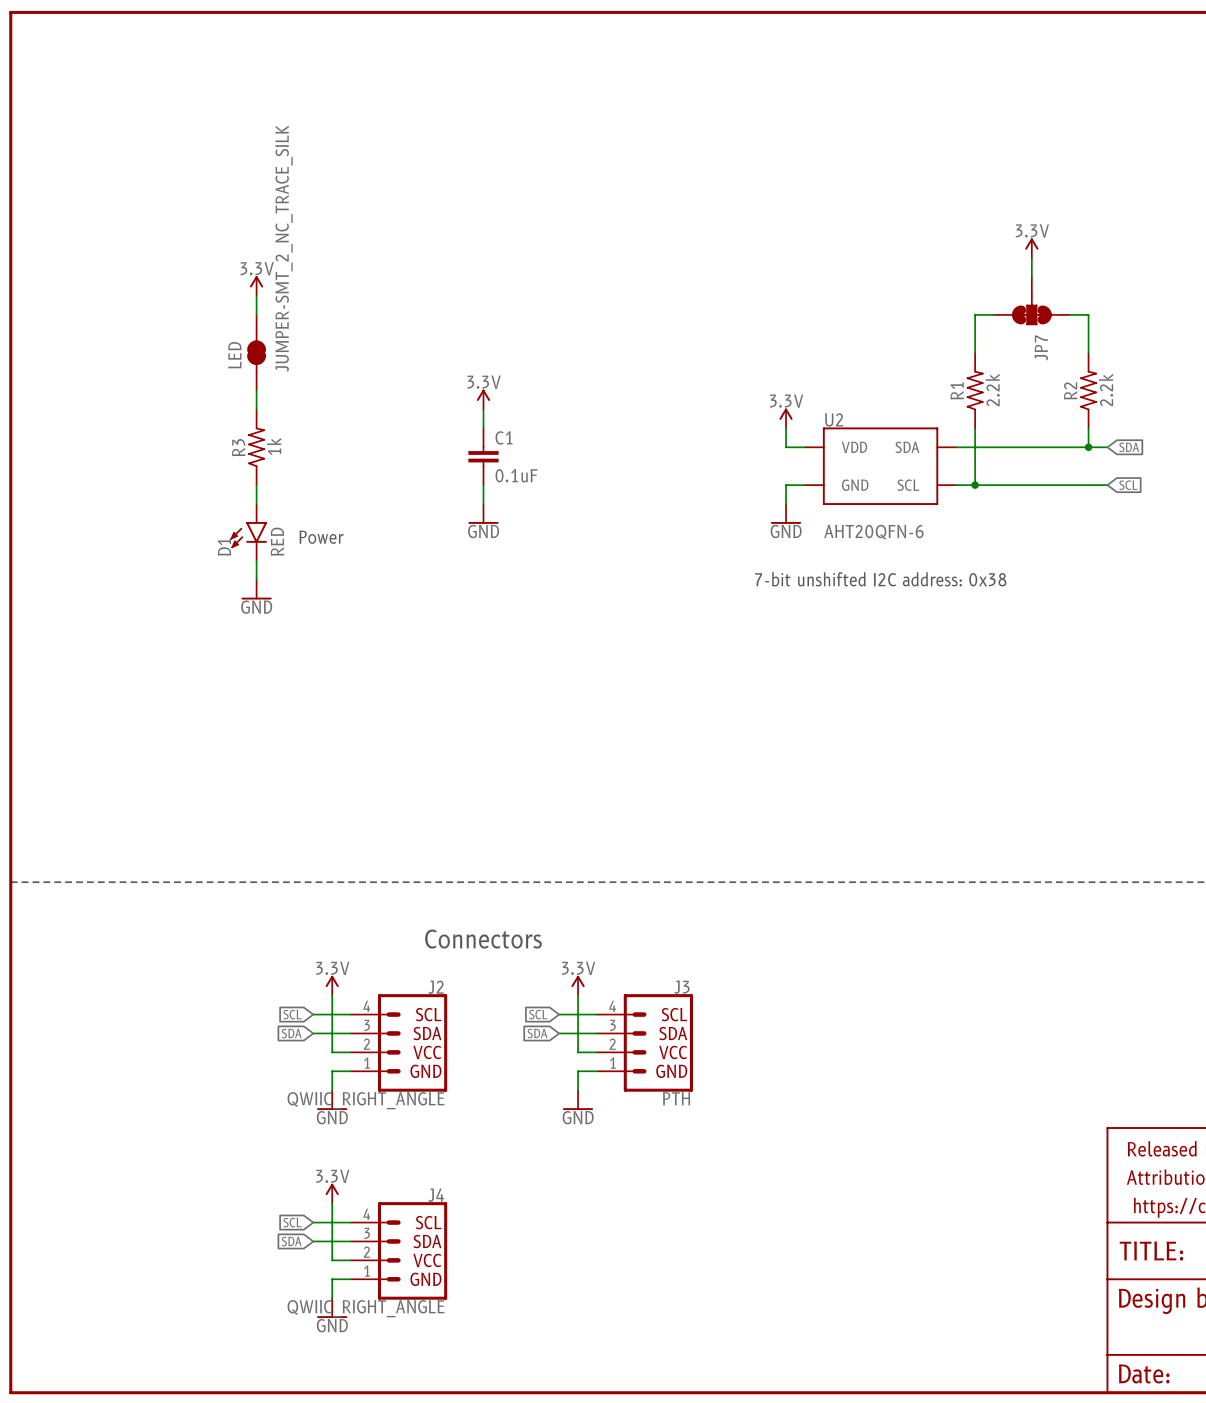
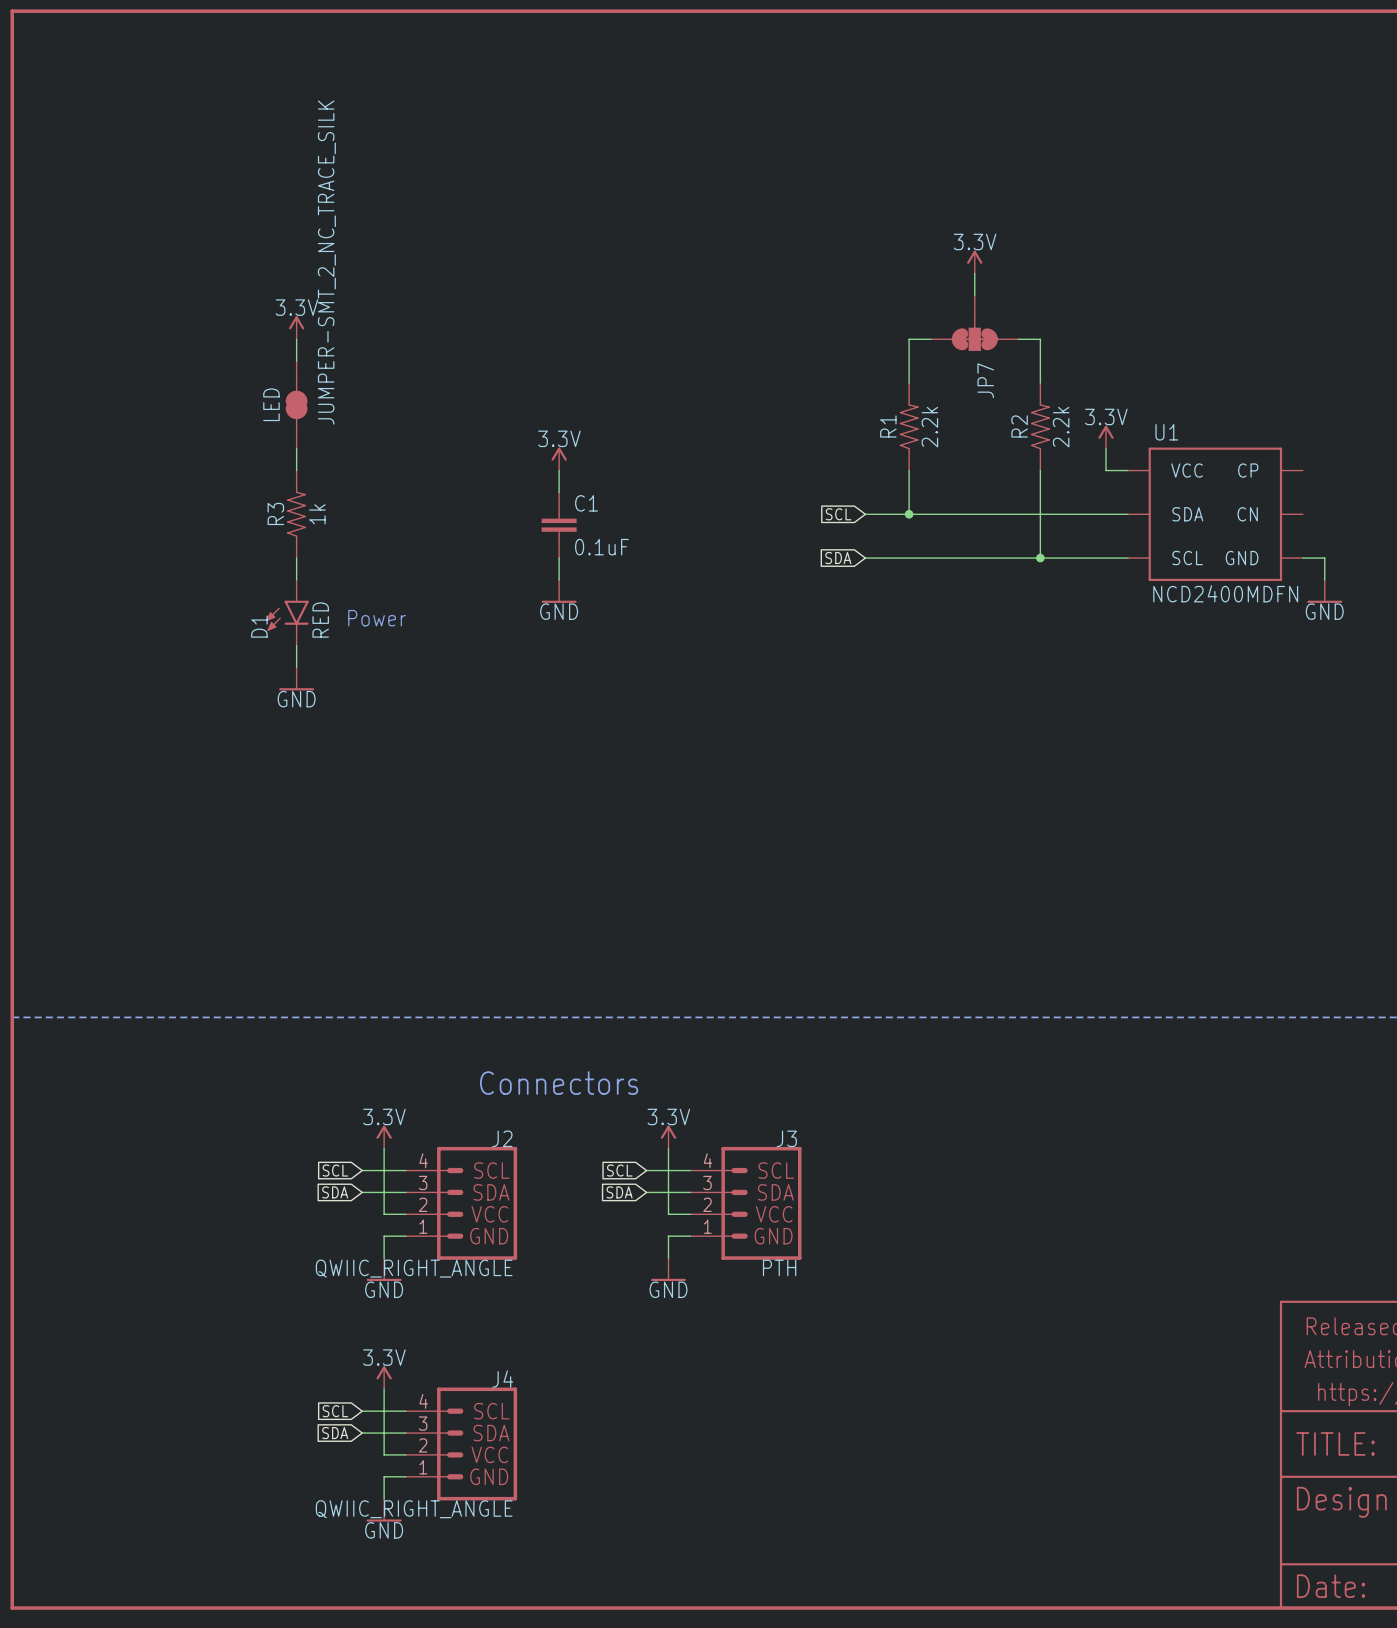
power symbol: none -> 3.3V (974, 262)
wire: none -> (974, 273) (974, 295)
power symbol: 3.3V (1031, 248) -> none
wire: (1031, 258) (1031, 277) -> none
wire: none -> (931, 339) (909, 339) (909, 383)
wire: none -> (1018, 339) (1040, 339) (1040, 383)
JP7 position: (1031, 301) -> (974, 323)
wire: (994, 314) (975, 314) (975, 352) -> none
wire: (1069, 314) (1088, 314) (1088, 352) -> none
power symbol: none -> 3.3V (1106, 437)
wire: none -> (1106, 448) (1106, 470) (1127, 470)
R1 position: (975, 390) -> (909, 426)
R2 position: (1088, 390) -> (1040, 426)
wire: none -> (1040, 470) (1040, 558)
power symbol: 3.3V (786, 418) -> none
wire: (975, 428) (975, 485) (1107, 485) -> none
wire: (1088, 428) (1088, 447) -> none
global label: none -> SCL (838, 514)
wire: none -> (865, 514) (909, 514)
junction: none -> (909, 514)
wire: none -> (931, 514) (1106, 514)
wire: (975, 447) (1107, 447) -> none
U1: none -> NCD2400MDFN (1215, 514)
junction: (1088, 447) -> none
global label: SDA (1129, 447) -> none
U2: AHT20QFN-6 (880, 466) -> none
global label: none -> SDA (838, 558)
wire: (786, 485) (786, 504) -> (909, 558) (865, 558)
wire: none -> (931, 558) (1106, 558)
junction: none -> (1040, 558)
junction: (975, 485) -> none
wire: none -> (1302, 558) (1324, 558) (1324, 579)
global label: SCL (1128, 485) -> none
power symbol: GND (786, 513) -> none
power symbol: none -> GND (1324, 591)
text: 7-bit unshifted I2C address: 0x38 (880, 579) -> none

